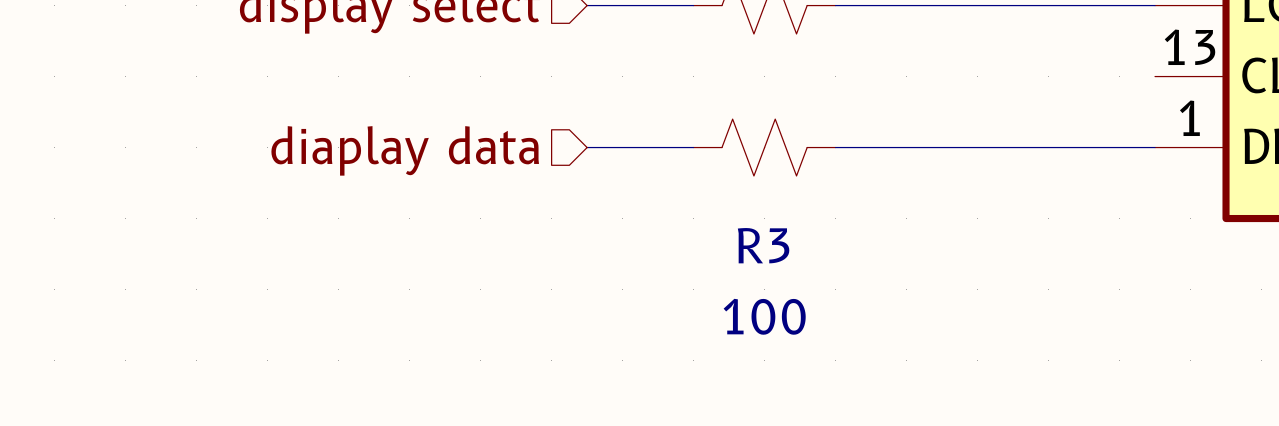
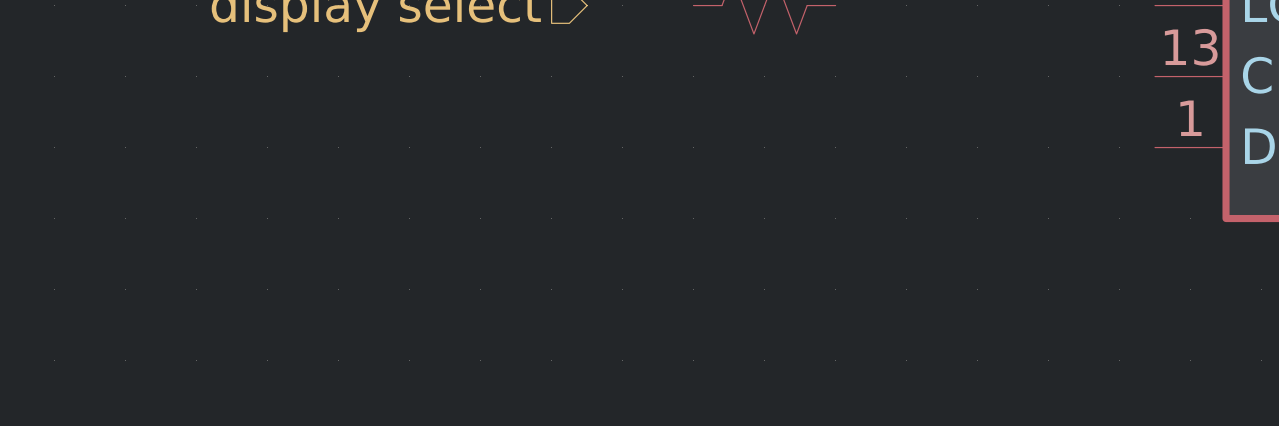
wire: (587, 5) (693, 5) -> none
wire: (835, 5) (1155, 5) -> none
wire: (587, 147) (693, 147) -> none
R3: 100 (764, 147) -> none
wire: (835, 147) (1155, 147) -> none
hierarchical label: diaplay data (405, 150) -> none

